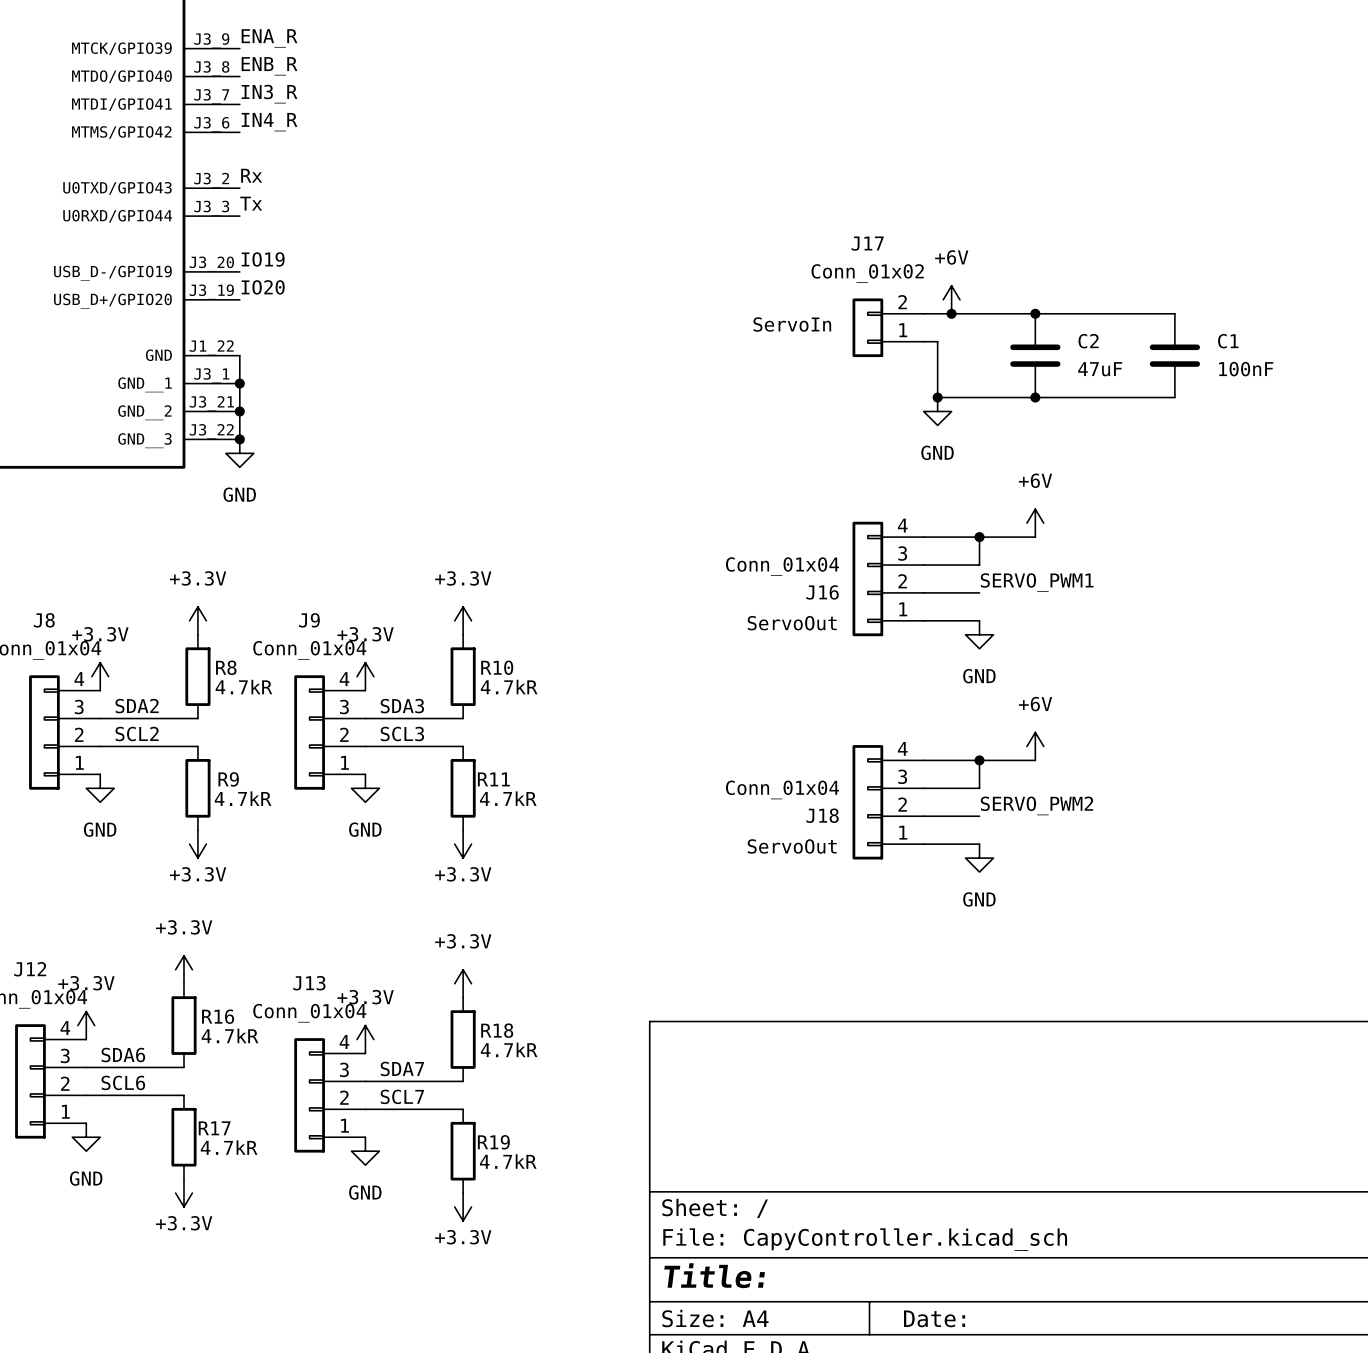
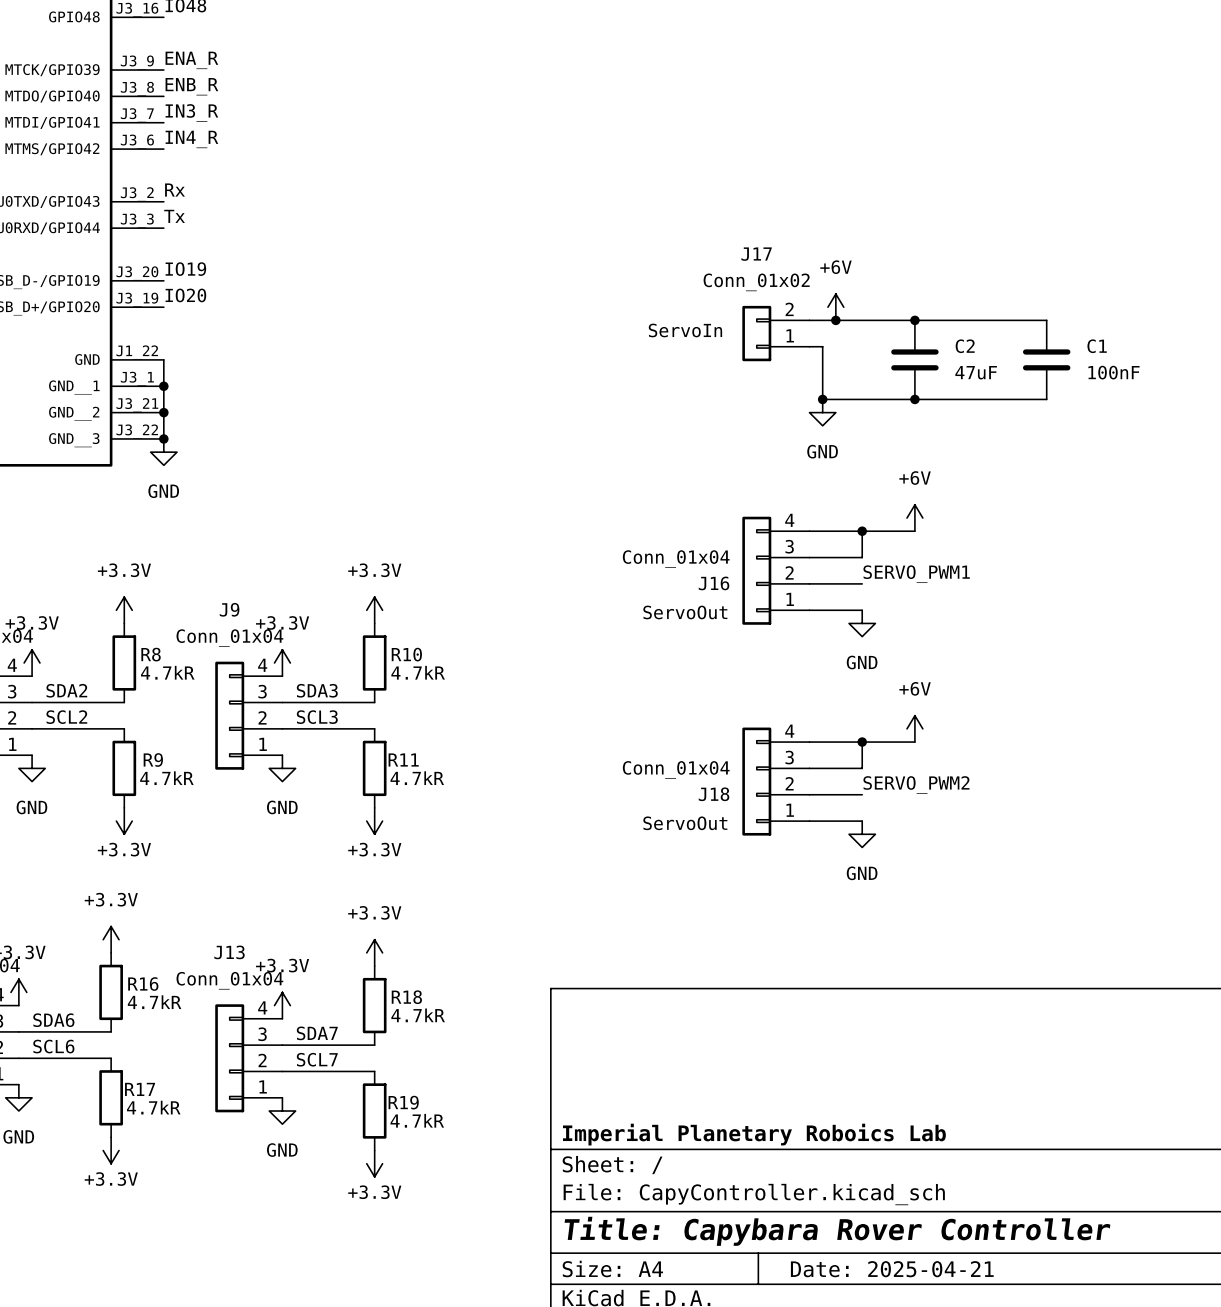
title block: none -> Imperial Planetary Roboics Lab (754, 1134)
title block: Title: (714, 1275) -> Title: Capybara Rover Controller (837, 1231)
title block: Date: (934, 1318) -> Date: 2025-04-21 (892, 1269)

